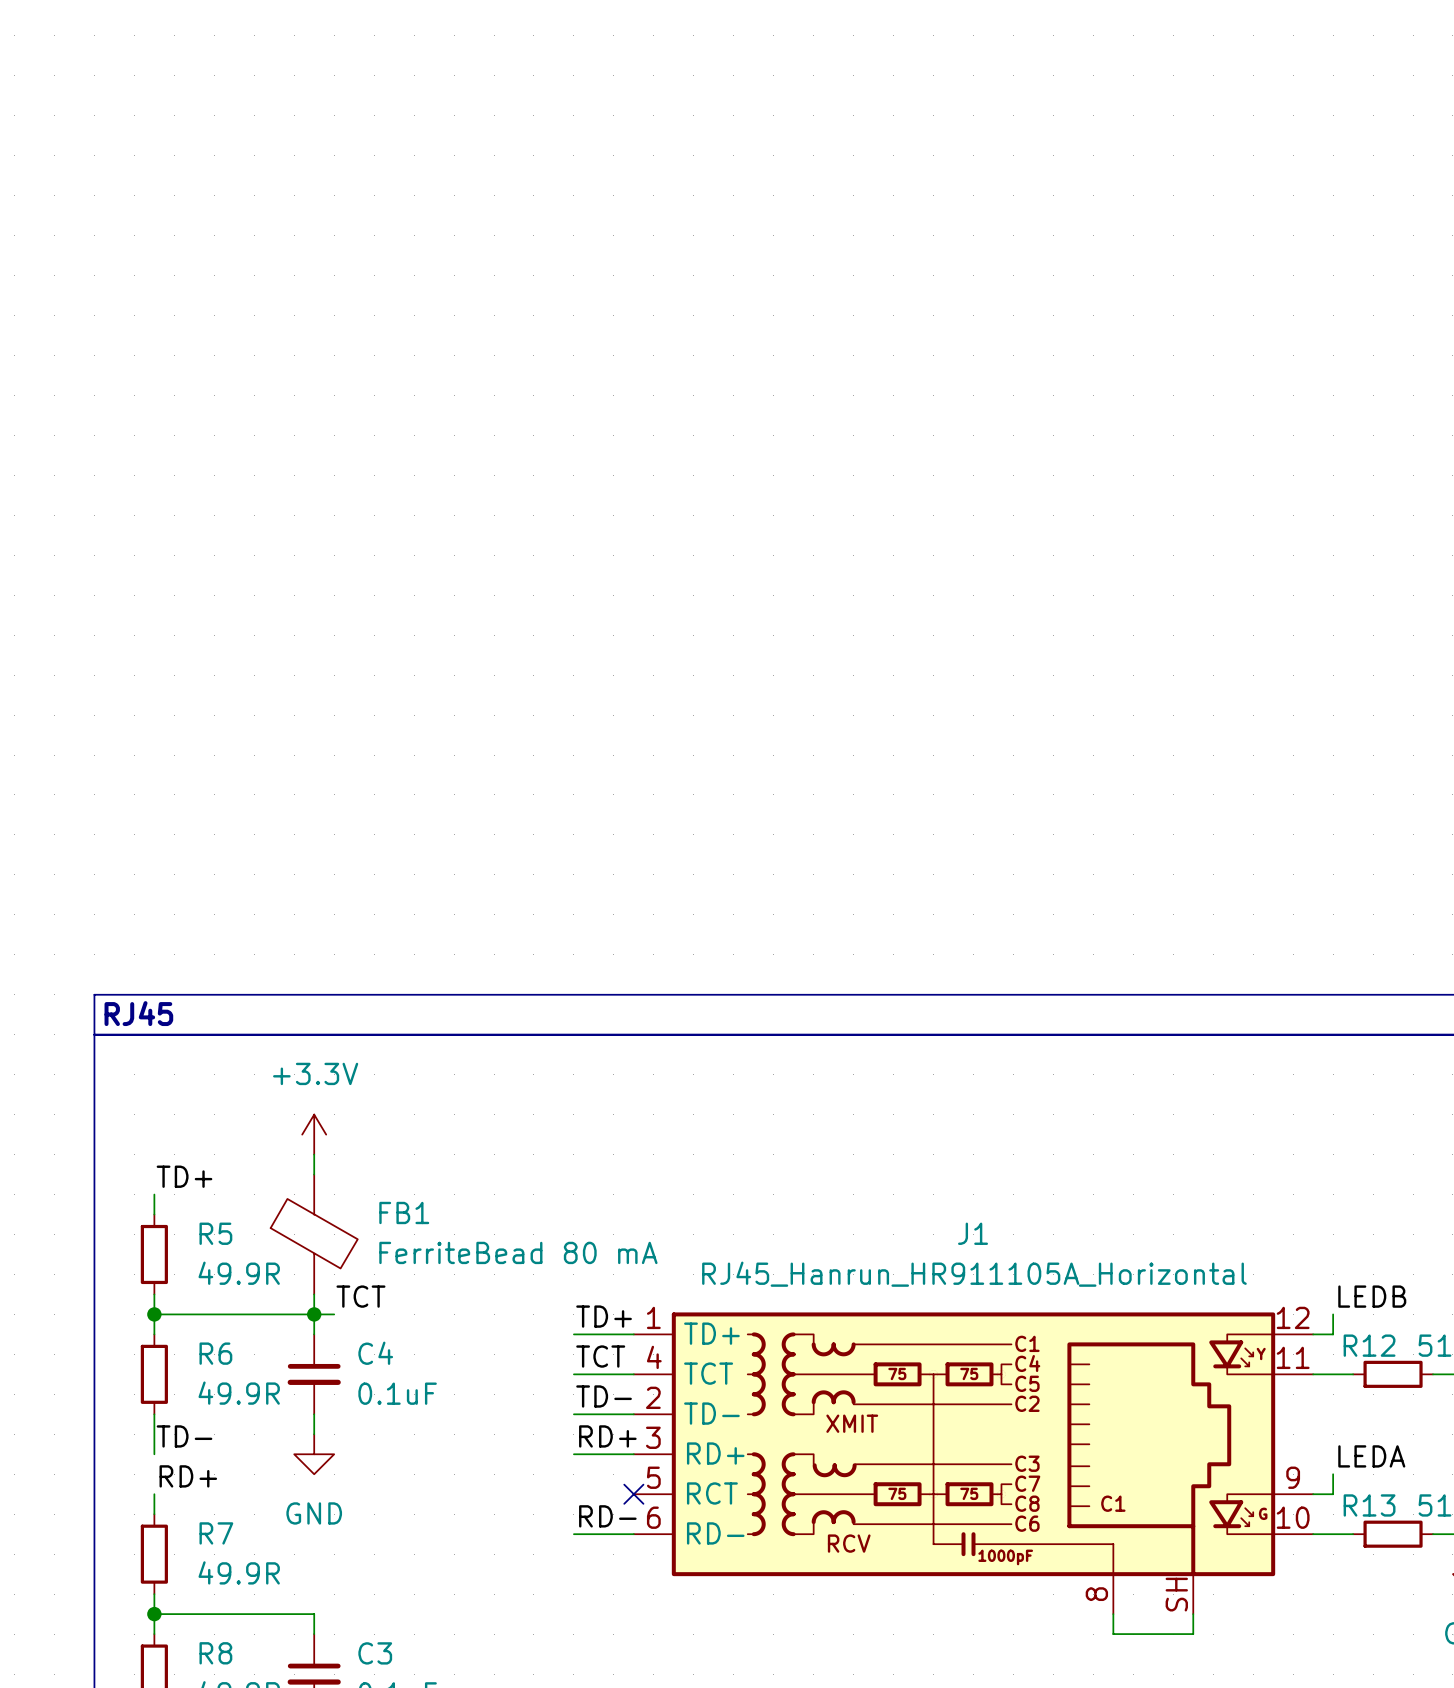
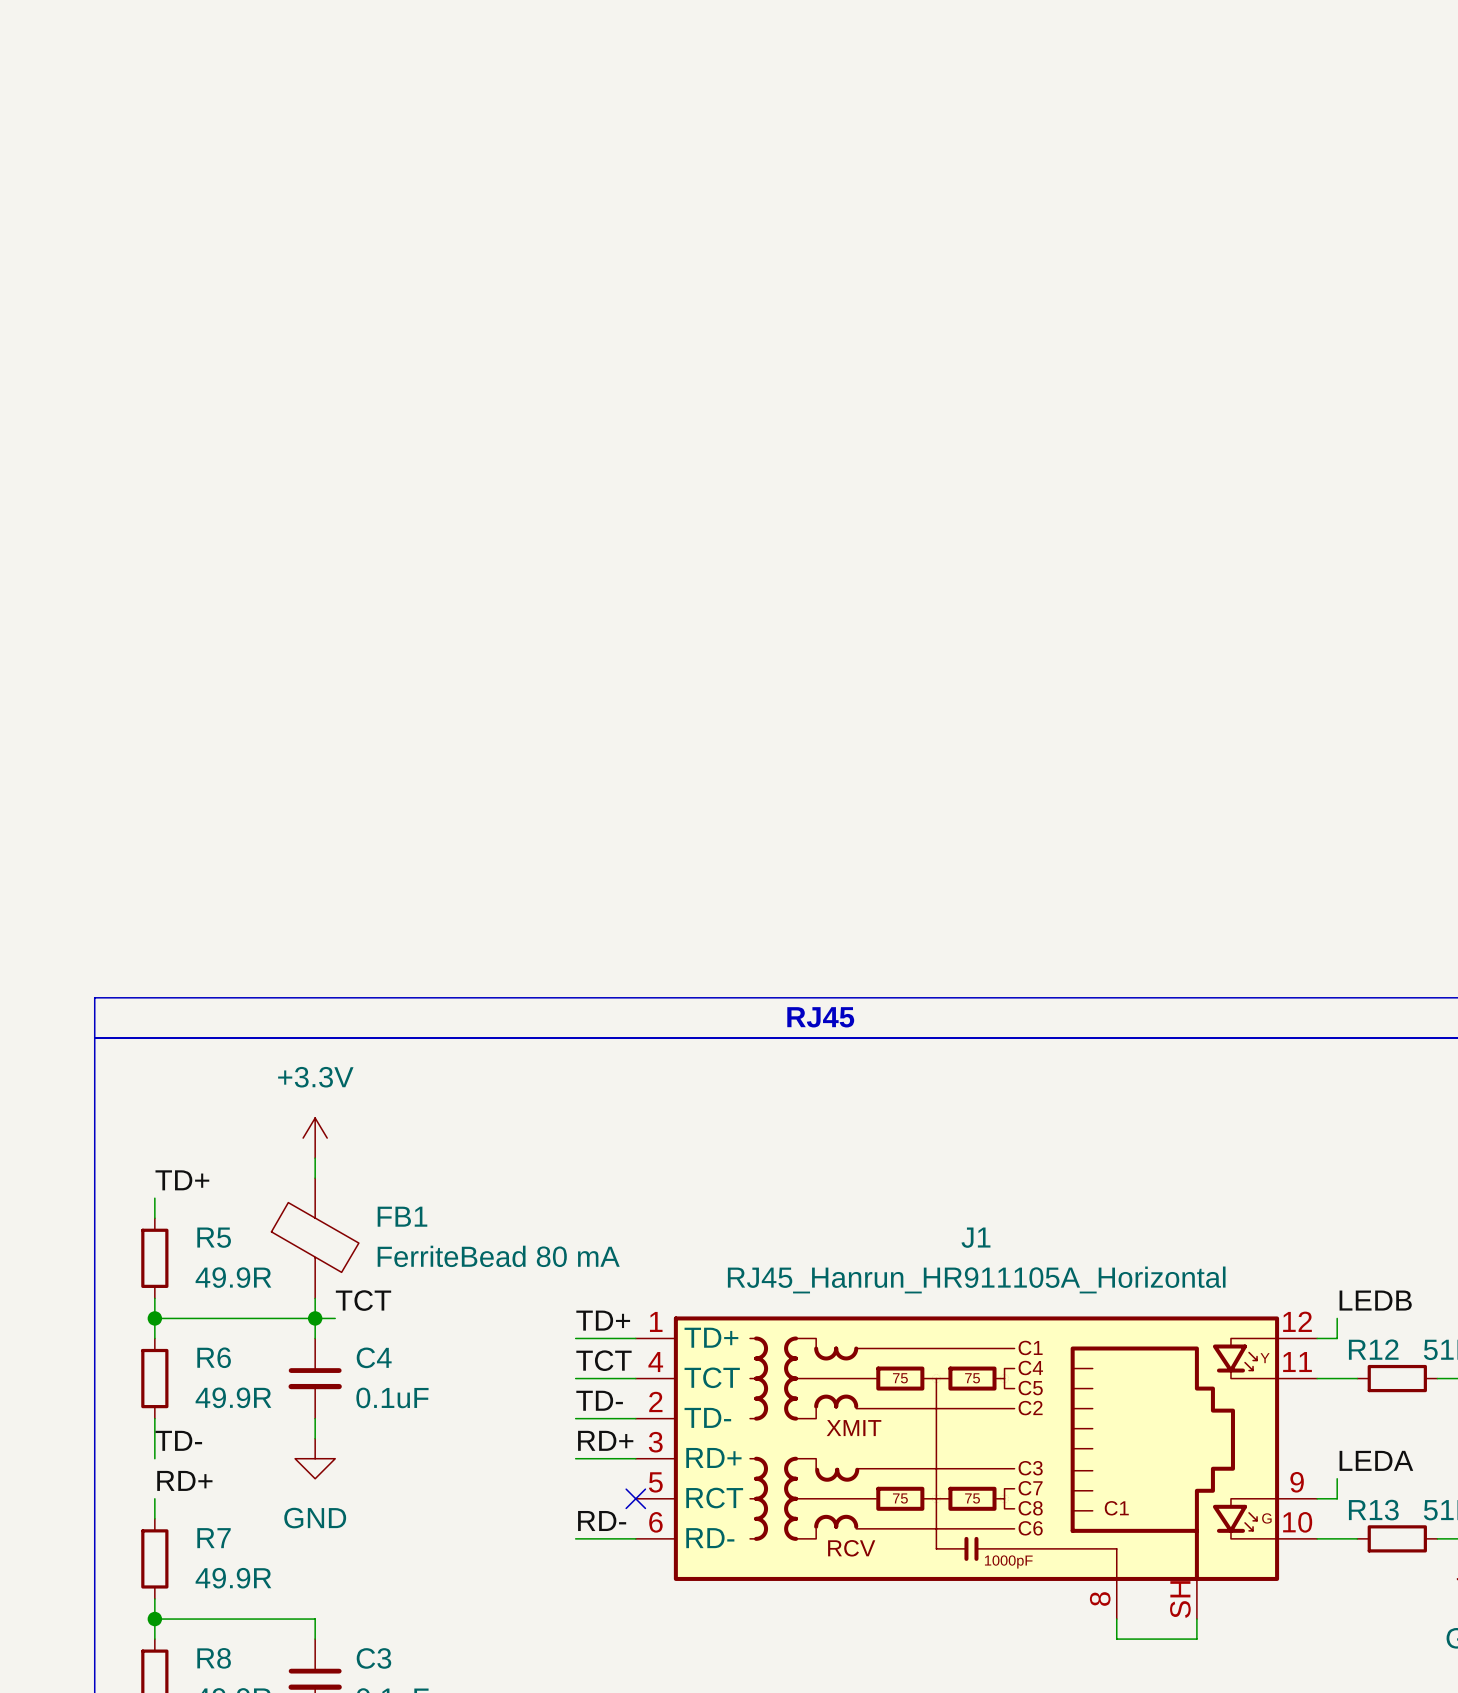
text: RJ45 (138, 1013) -> none
text: none -> RJ45 (820, 1017)

